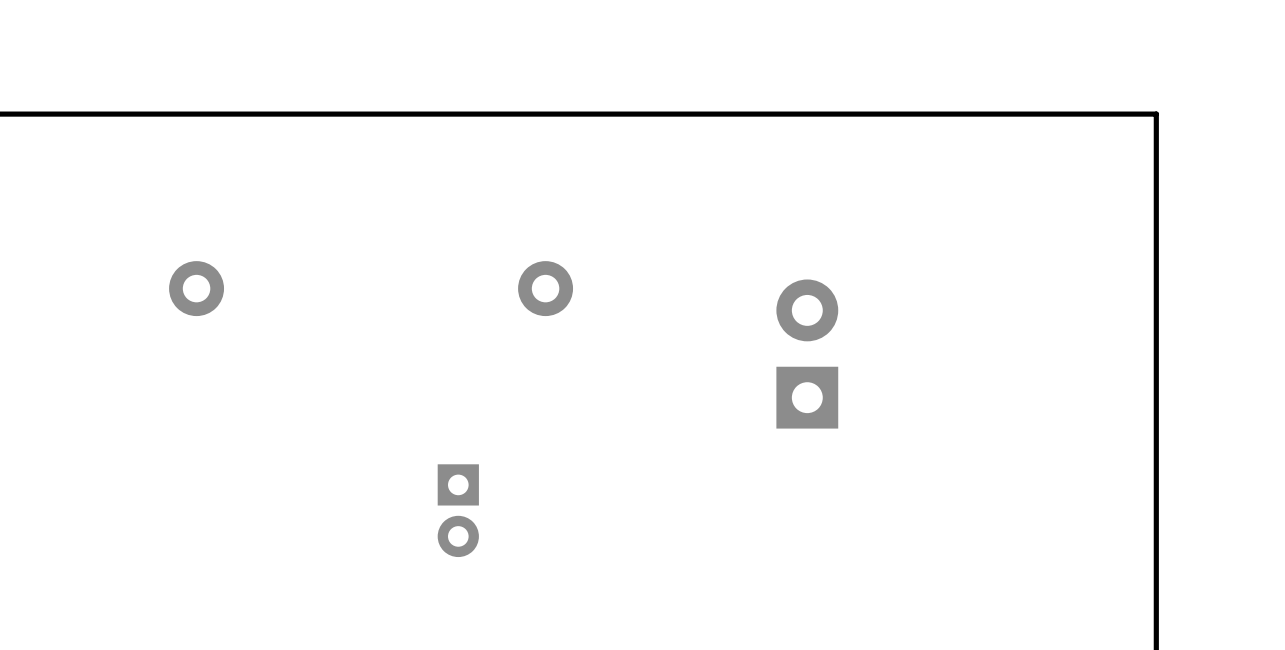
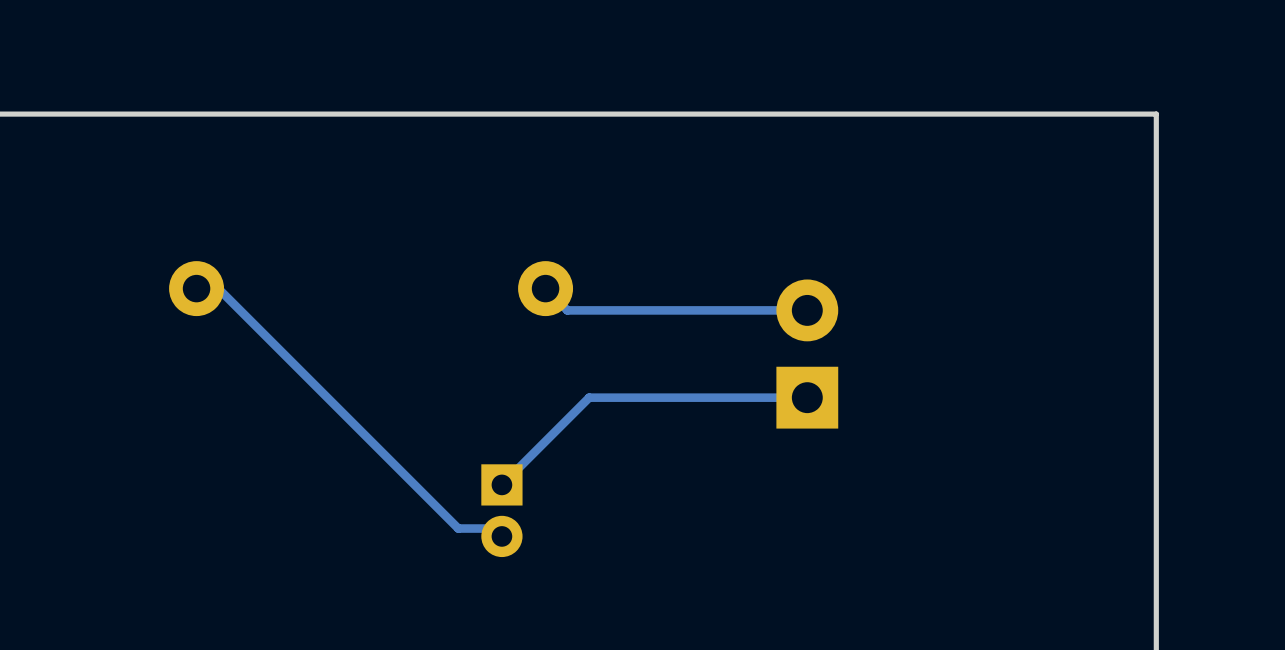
track: none -> (196, 288) (218, 288) (458, 528) (501, 528) (501, 536)
track: none -> (545, 288) (567, 310) (807, 310)
track: none -> (807, 397) (589, 397) (501, 484)
part position: (458, 510) -> (501, 510)

